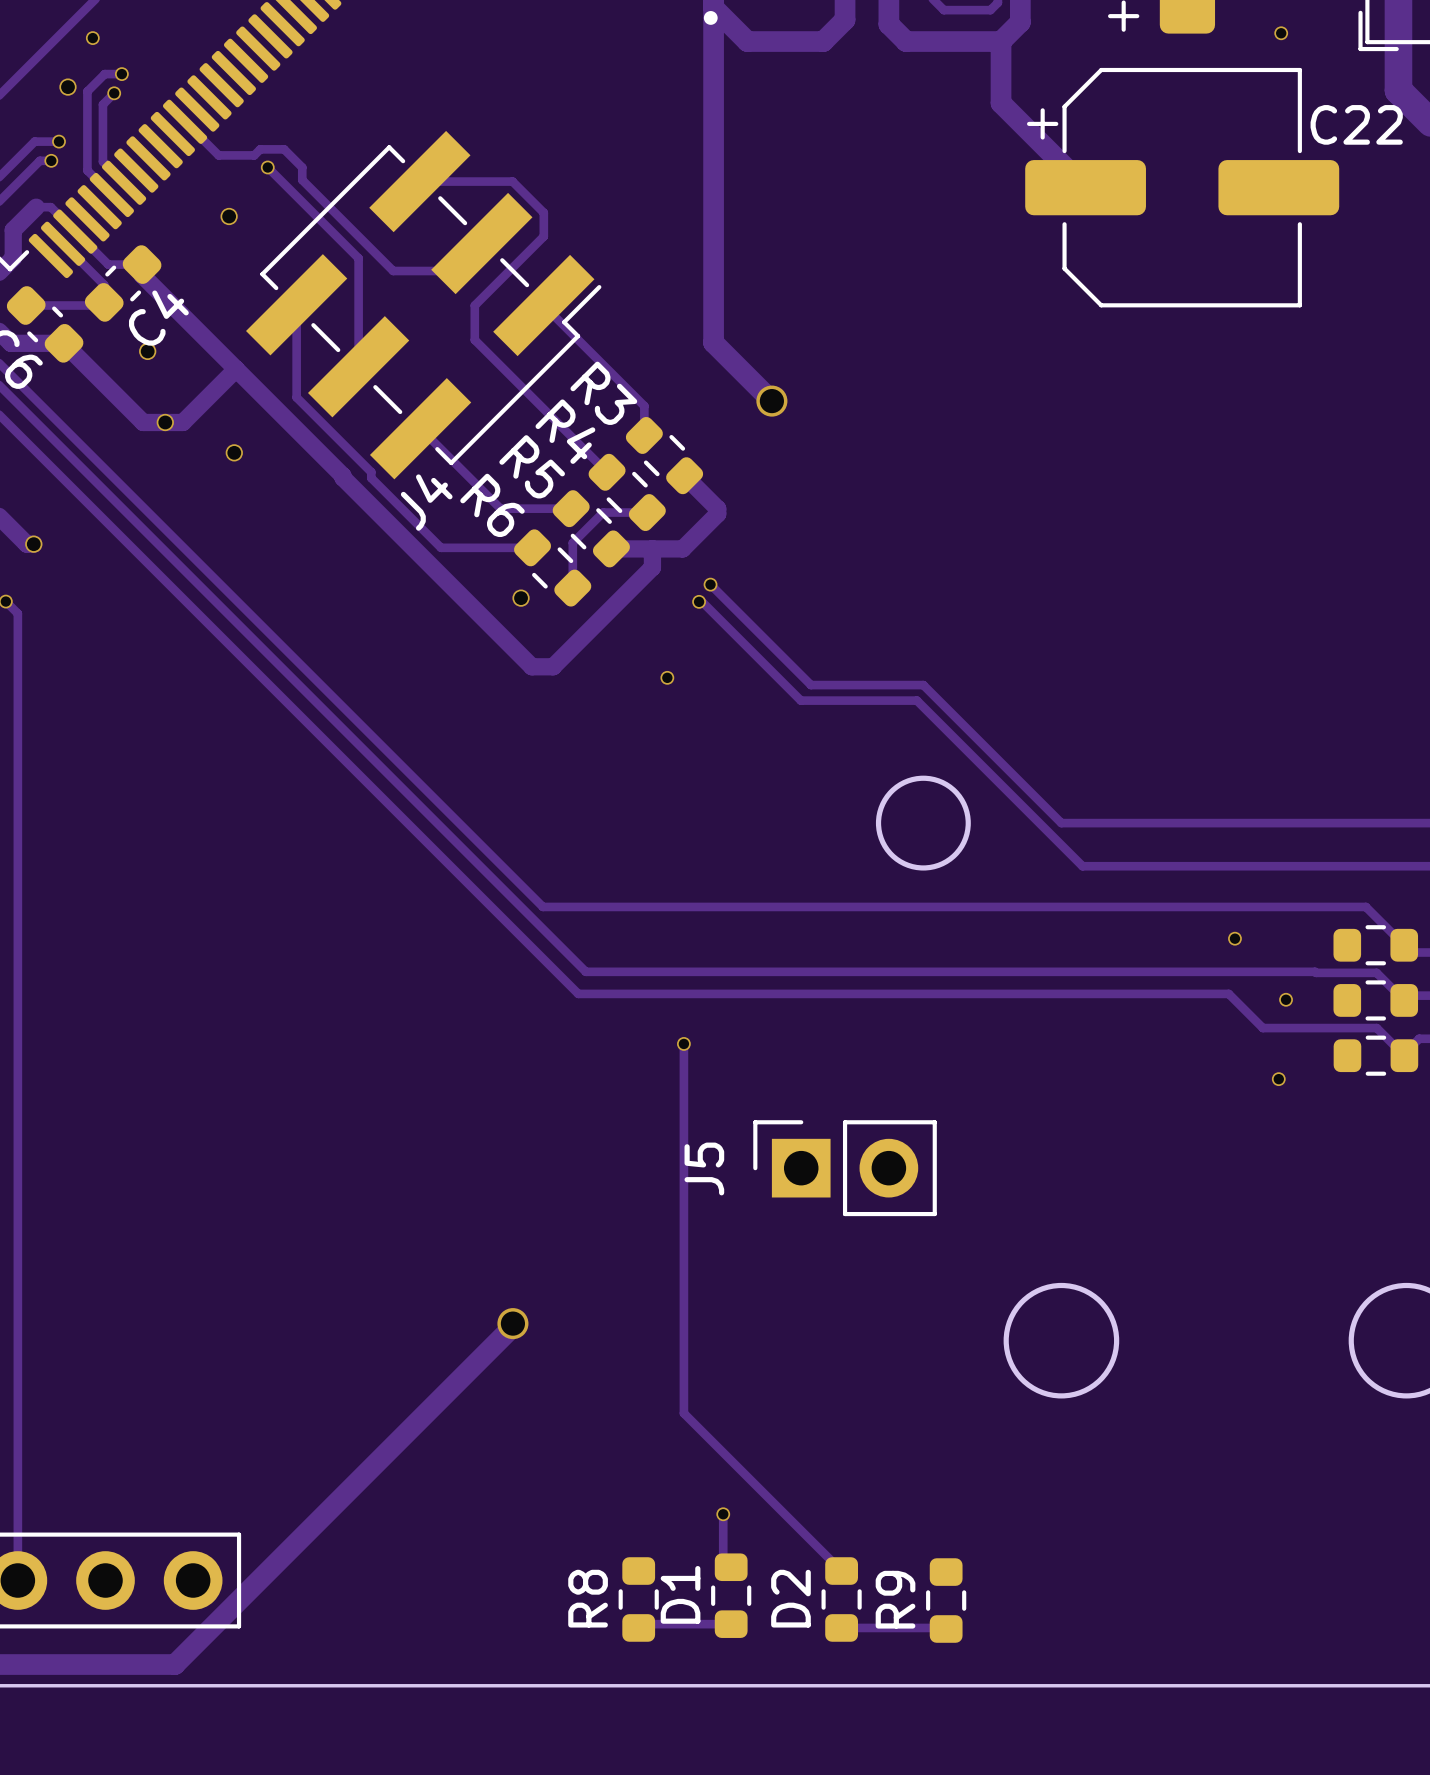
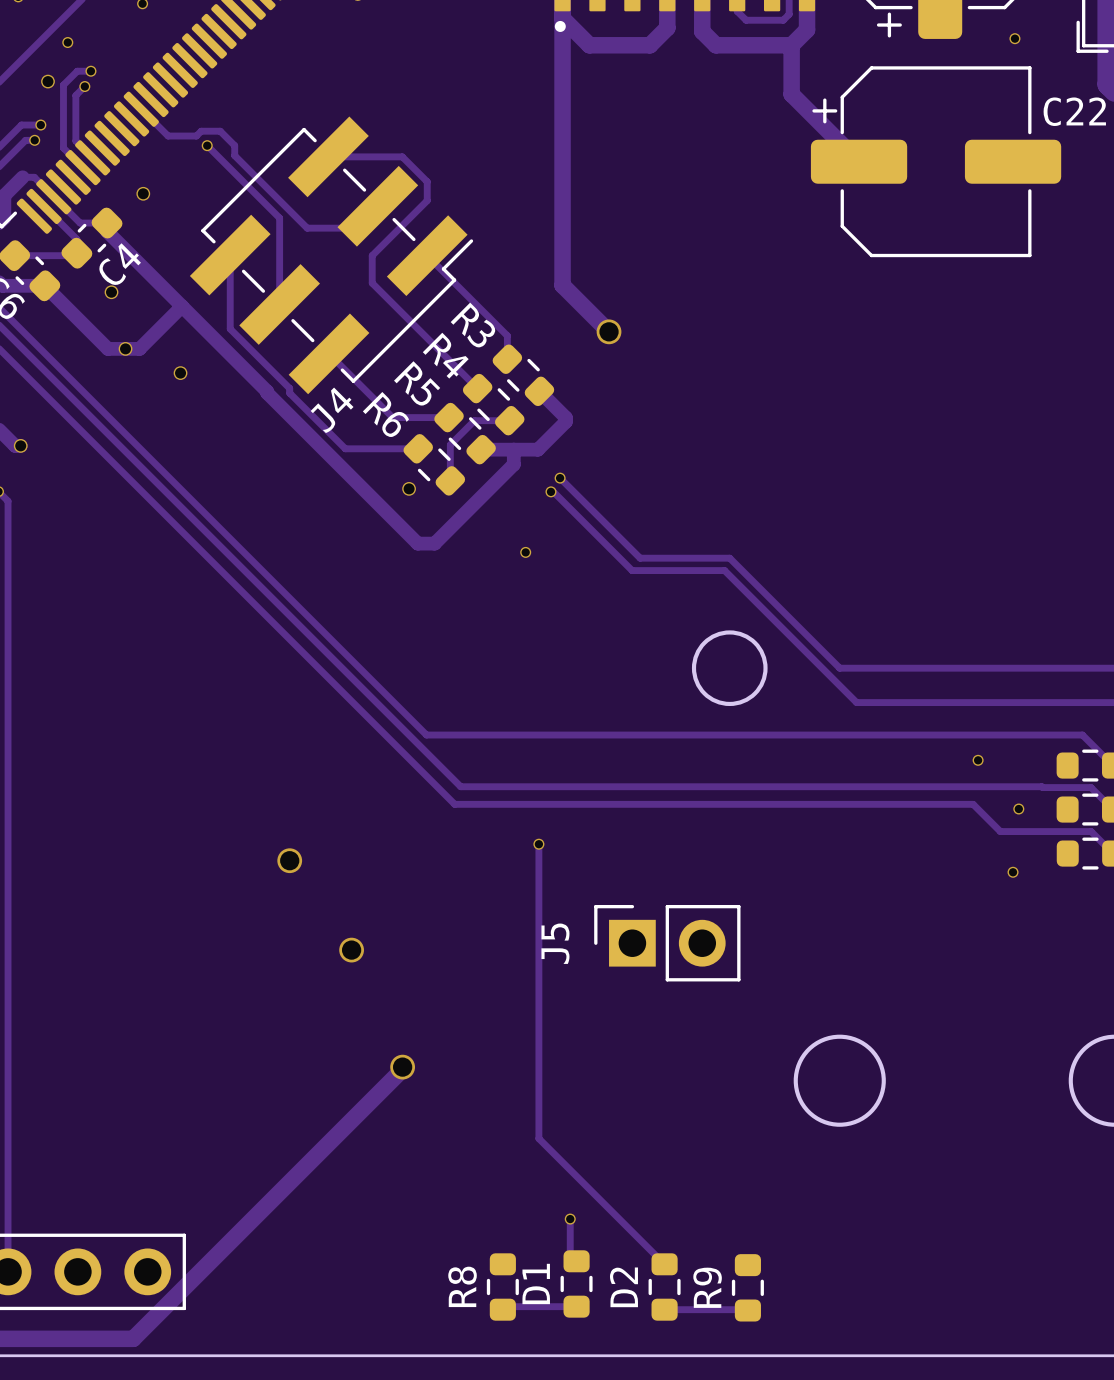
via position: (229, 216) -> (143, 193)
via: none -> (289, 860)
via: none -> (351, 950)

